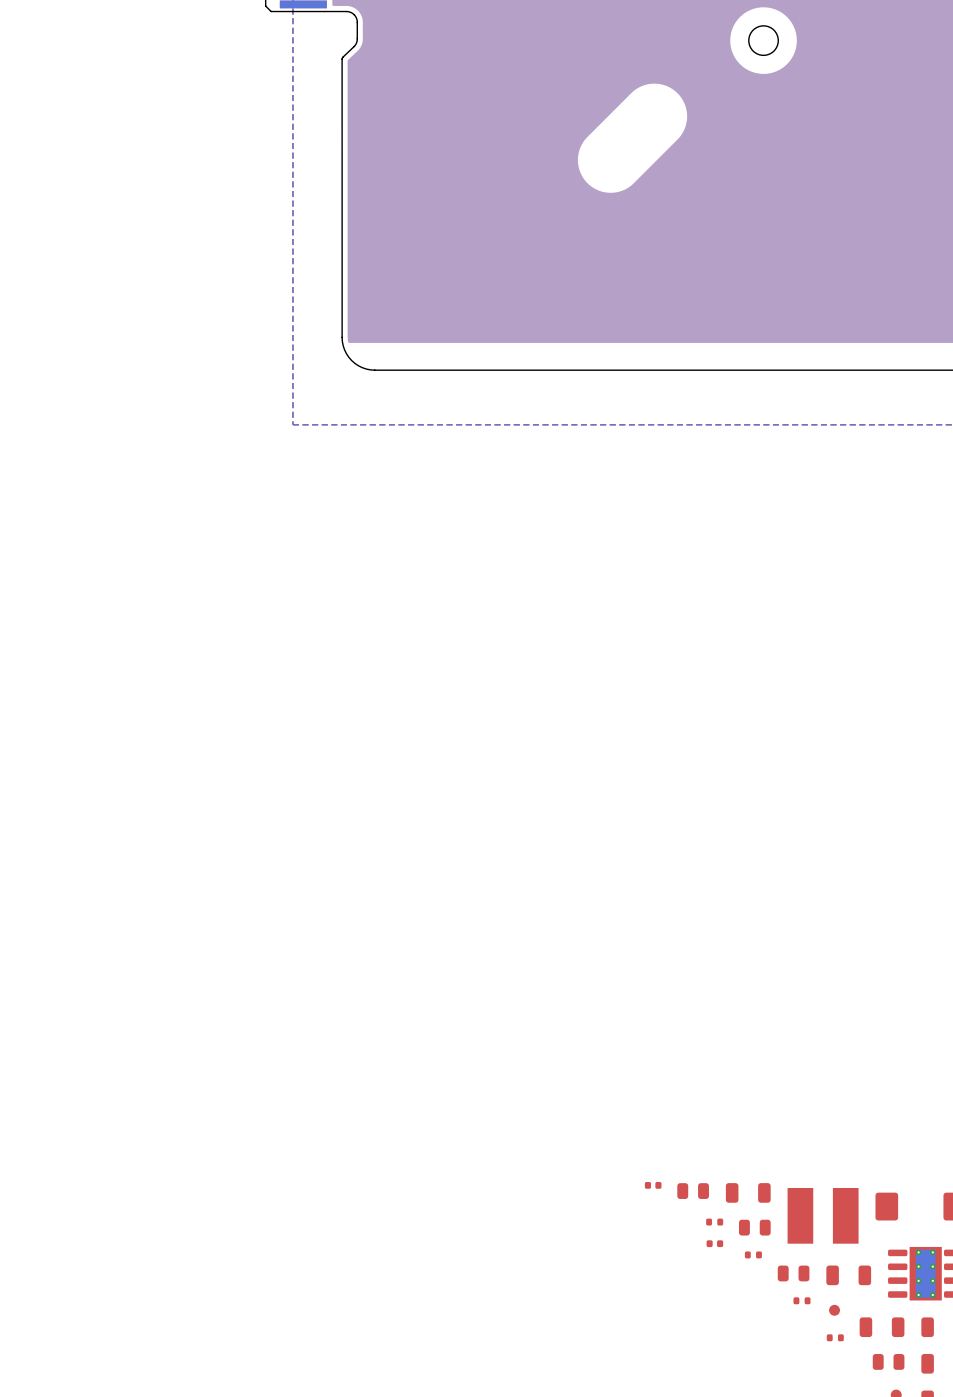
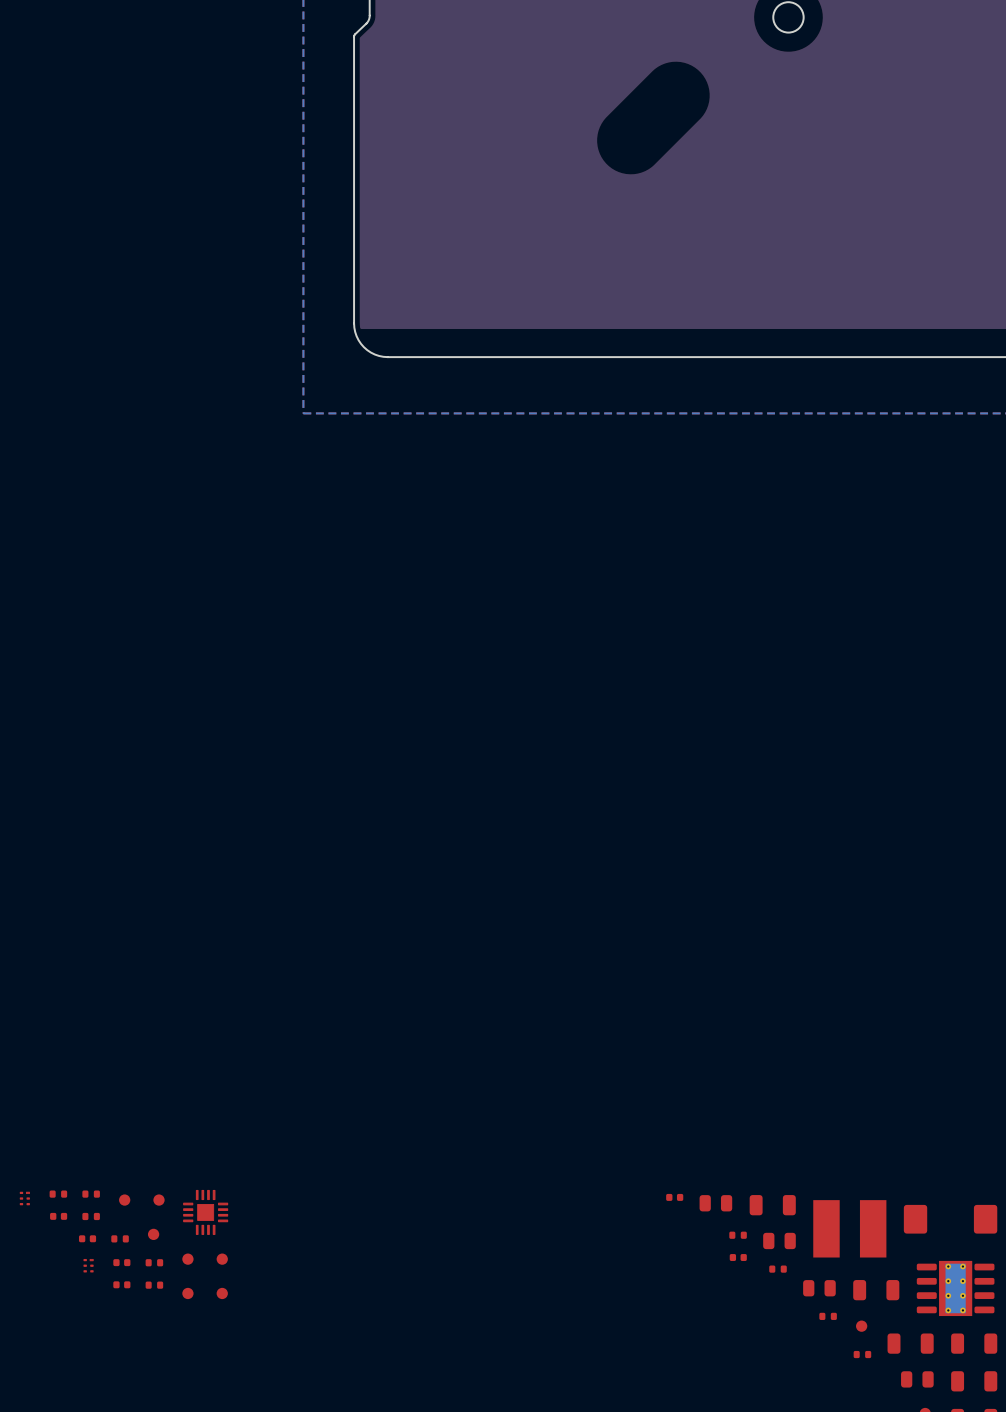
part: none -> (58, 1194)
part: none -> (91, 1194)
part: none -> (24, 1198)
part: none -> (124, 1200)
part: none -> (159, 1200)
part: none -> (205, 1212)
part: none -> (58, 1216)
part: none -> (91, 1216)
part: none -> (153, 1234)
part: none -> (87, 1238)
part: none -> (120, 1238)
part: none -> (187, 1259)
part: none -> (222, 1259)
part: none -> (121, 1262)
part: none -> (154, 1262)
part: none -> (88, 1265)
part: none -> (121, 1284)
part: none -> (154, 1285)
part: none -> (187, 1293)
part: none -> (222, 1293)

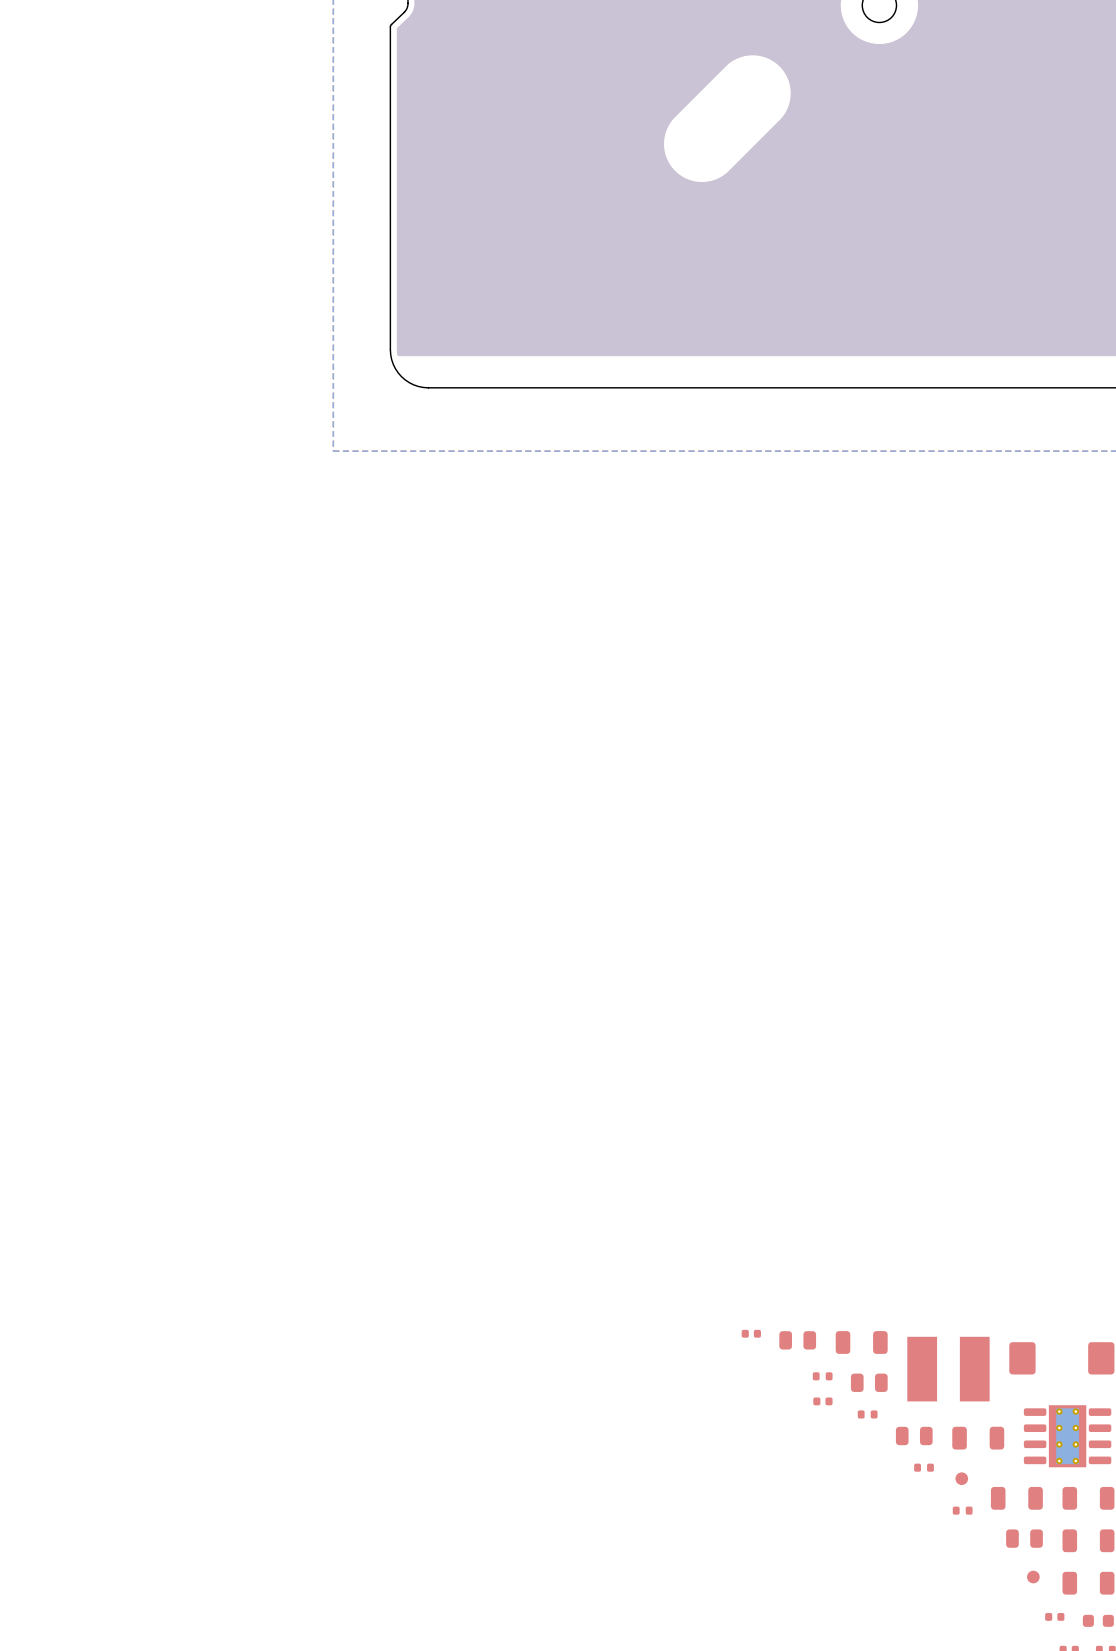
part: (58, 1194) -> none
part: (91, 1194) -> none
part: (24, 1198) -> none
part: (124, 1200) -> none
part: (159, 1200) -> none
part: (205, 1212) -> none
part: (58, 1216) -> none
part: (91, 1216) -> none
part: (153, 1234) -> none
part: (87, 1238) -> none
part: (120, 1238) -> none
part: (187, 1259) -> none
part: (222, 1259) -> none
part: (121, 1262) -> none
part: (154, 1262) -> none
part: (88, 1265) -> none
part: (121, 1284) -> none
part: (154, 1285) -> none
part: (187, 1293) -> none
part: (222, 1293) -> none

